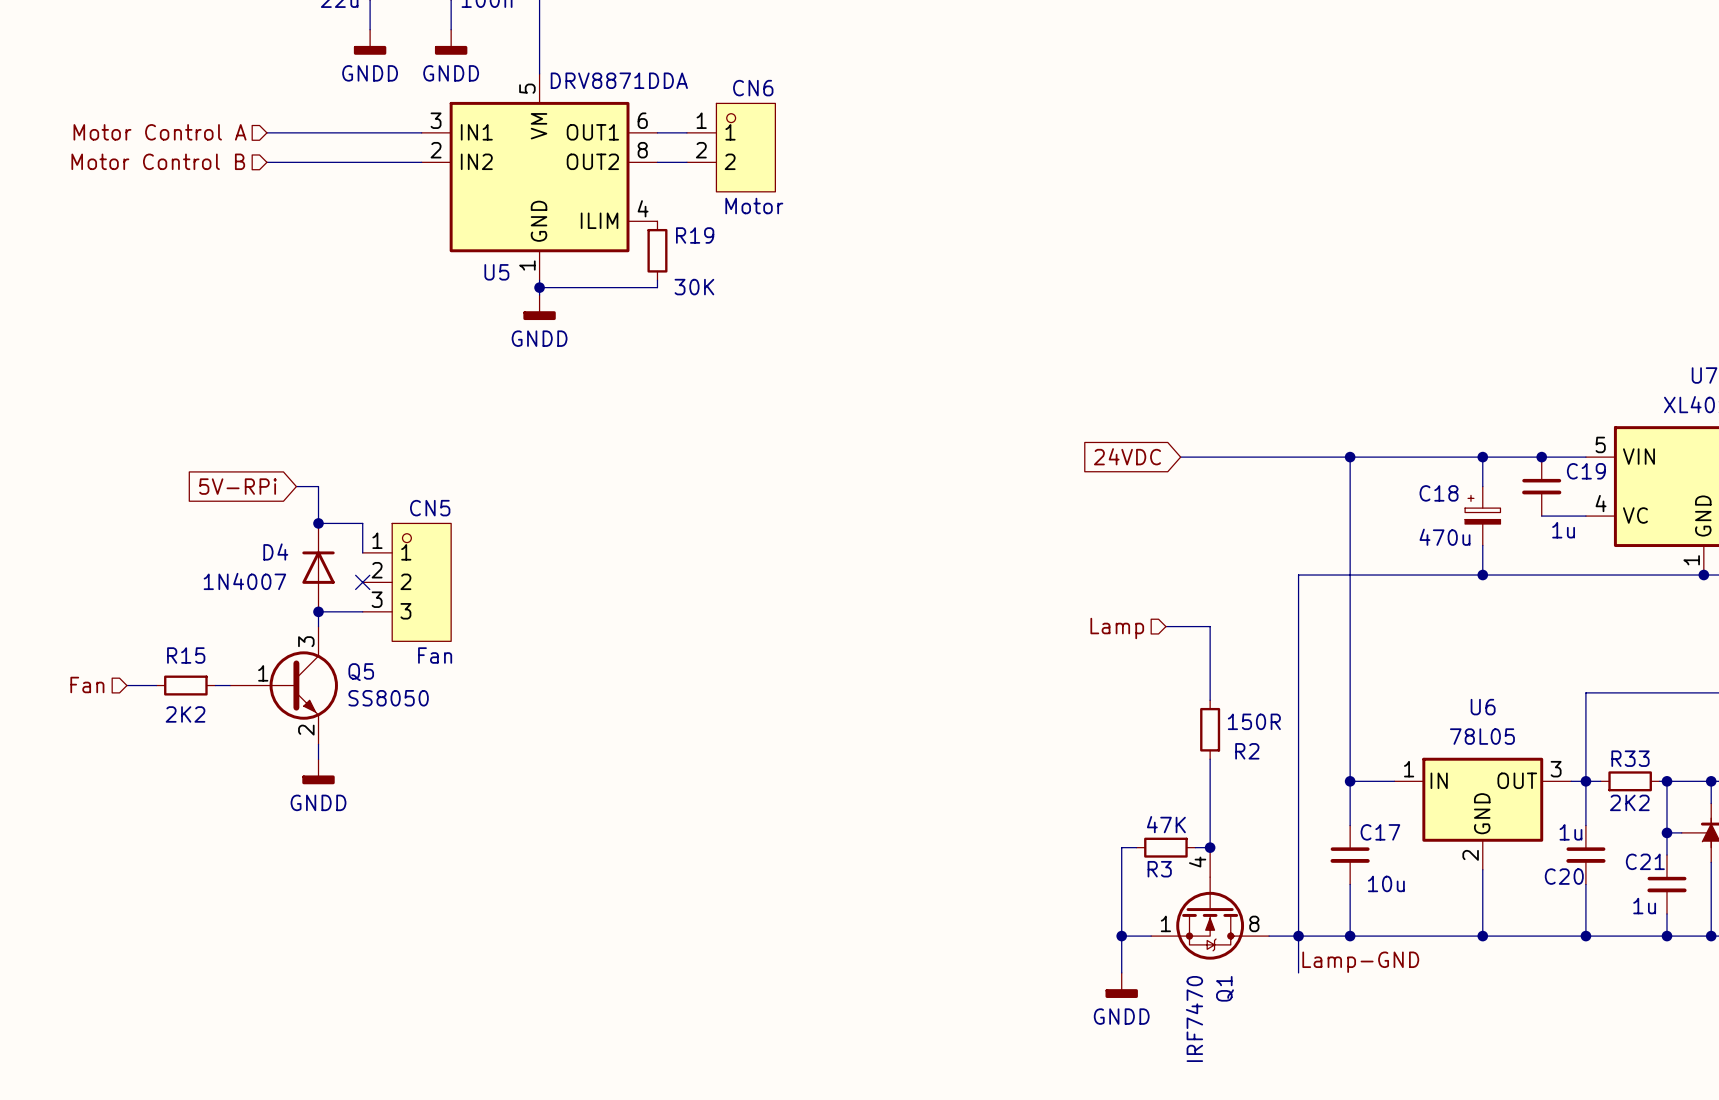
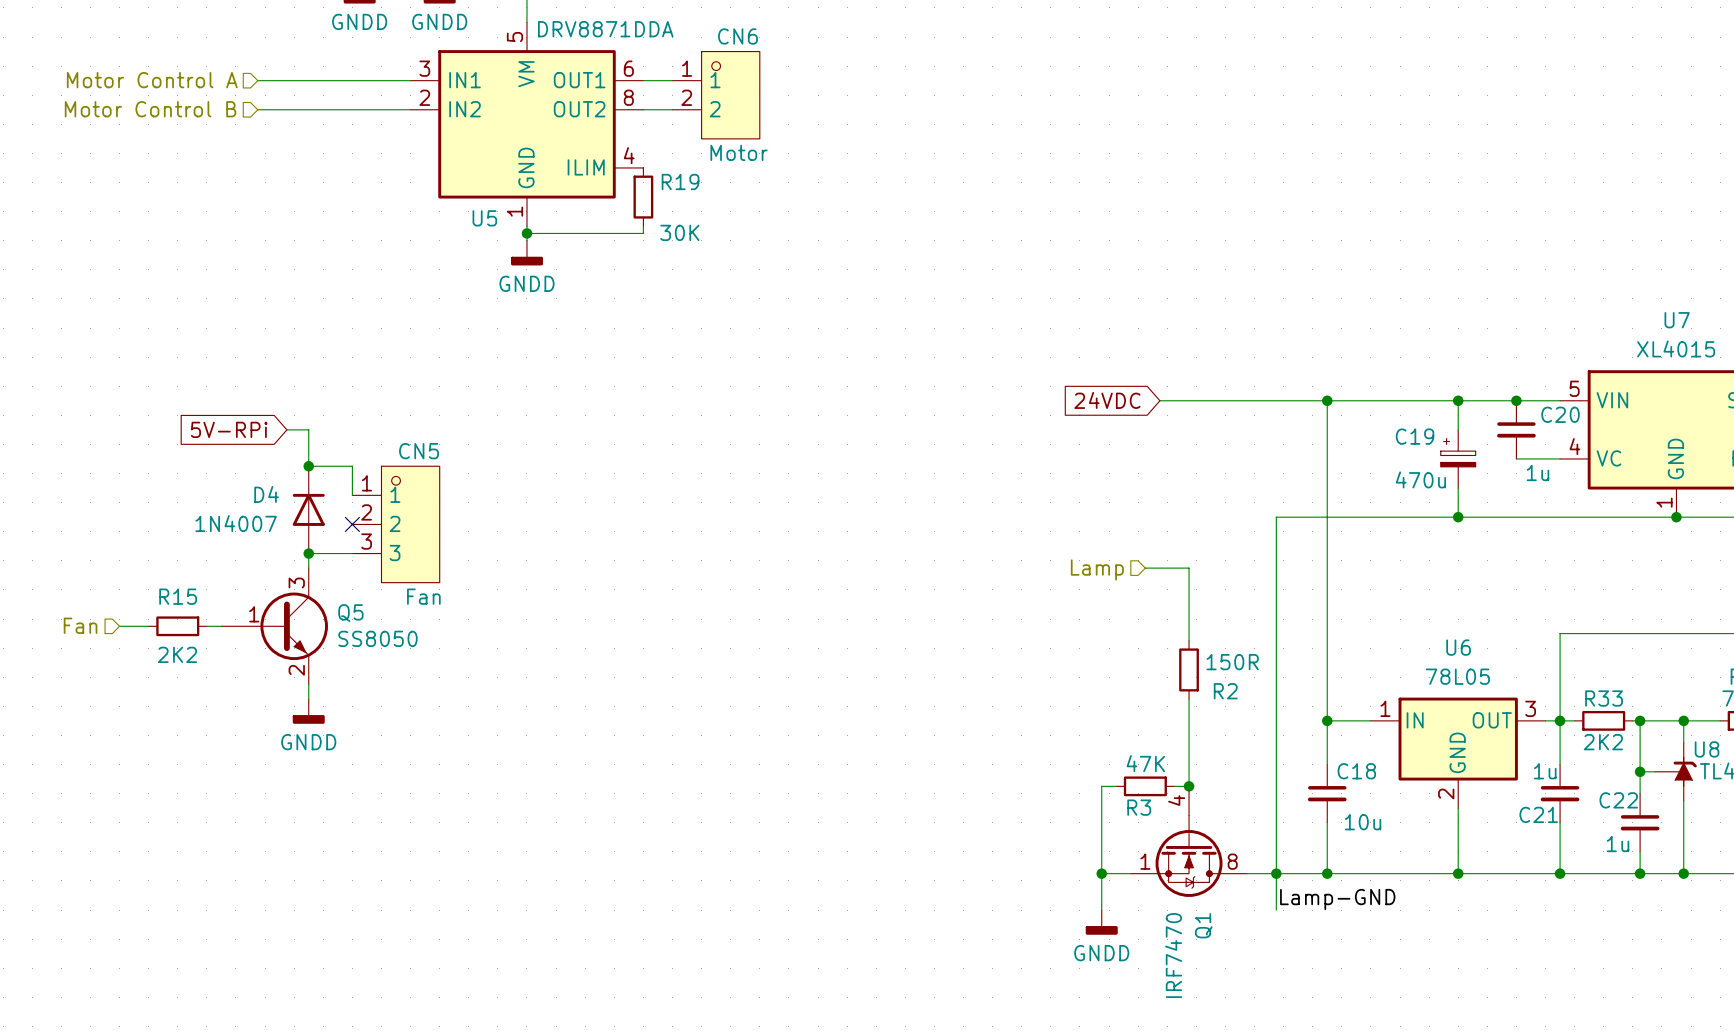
C19 name: C19 (1586, 471) -> C20 (1560, 414)
C18 name: C18 (1439, 493) -> C19 (1415, 436)
C17 name: C17 (1380, 832) -> C18 (1356, 771)
C21 name: C21 (1645, 861) -> C22 (1618, 800)
C20 name: C20 (1564, 876) -> C21 (1538, 814)

